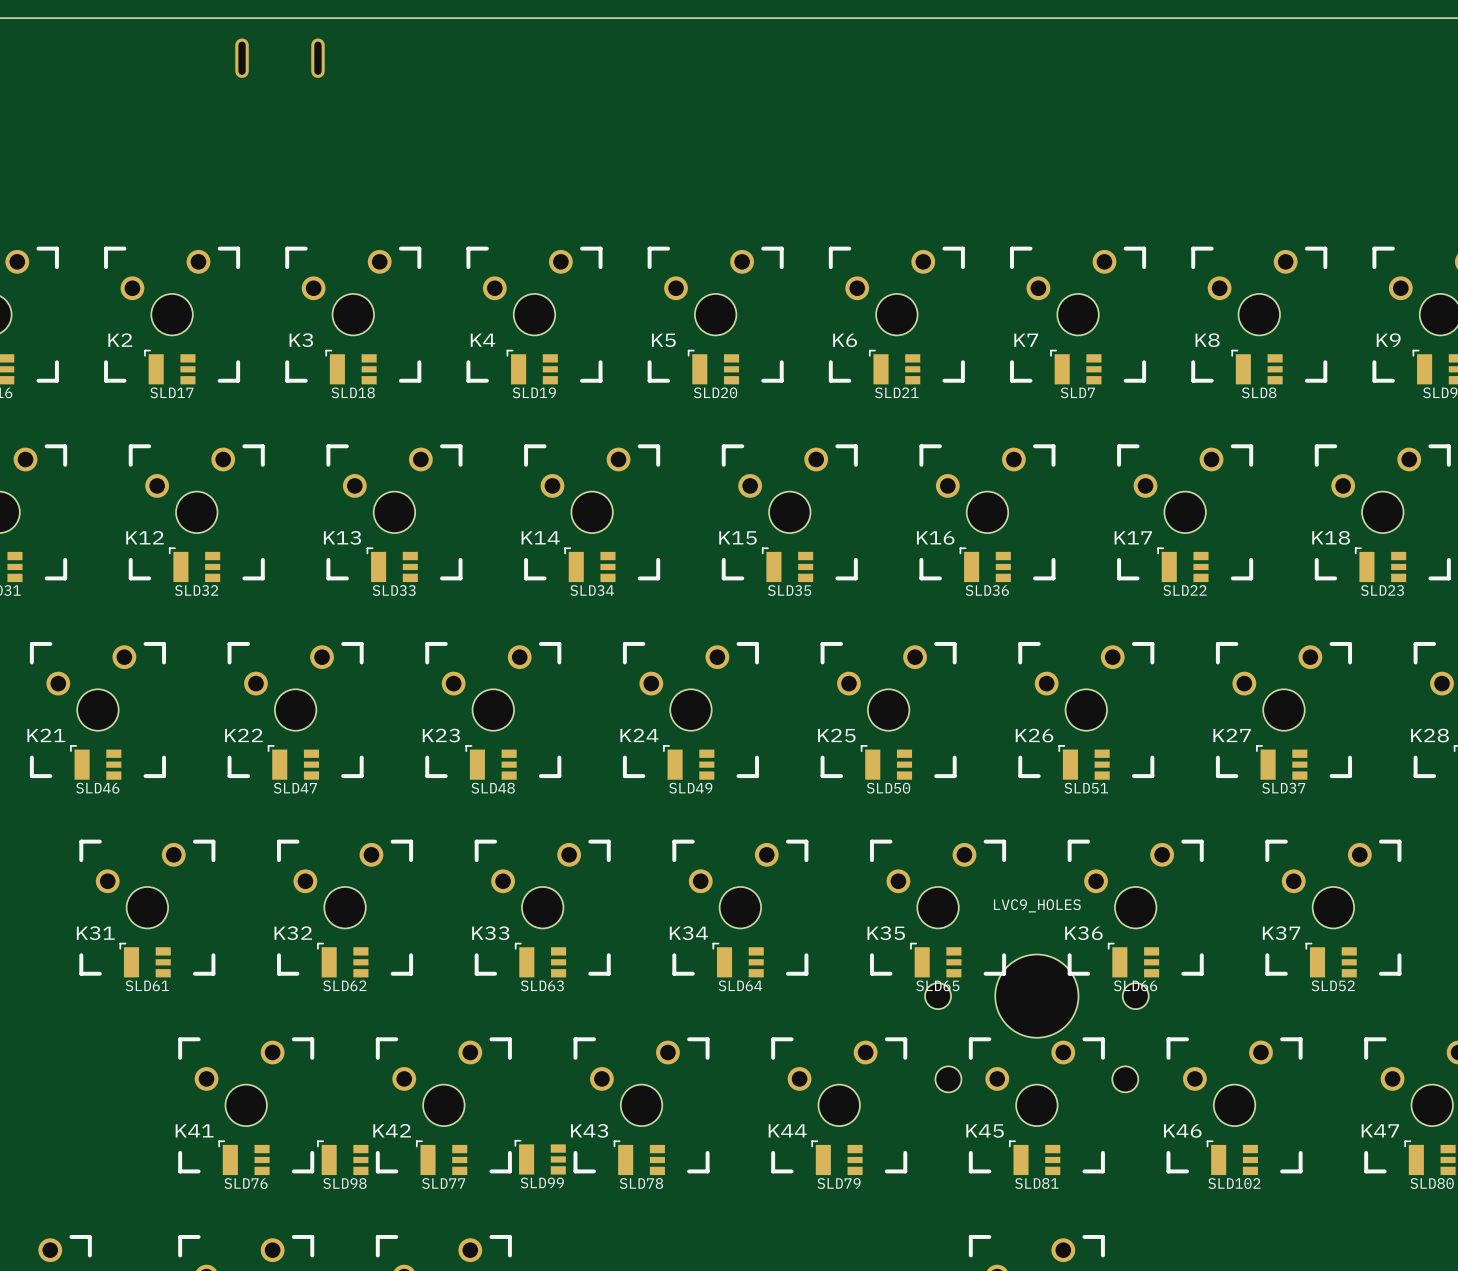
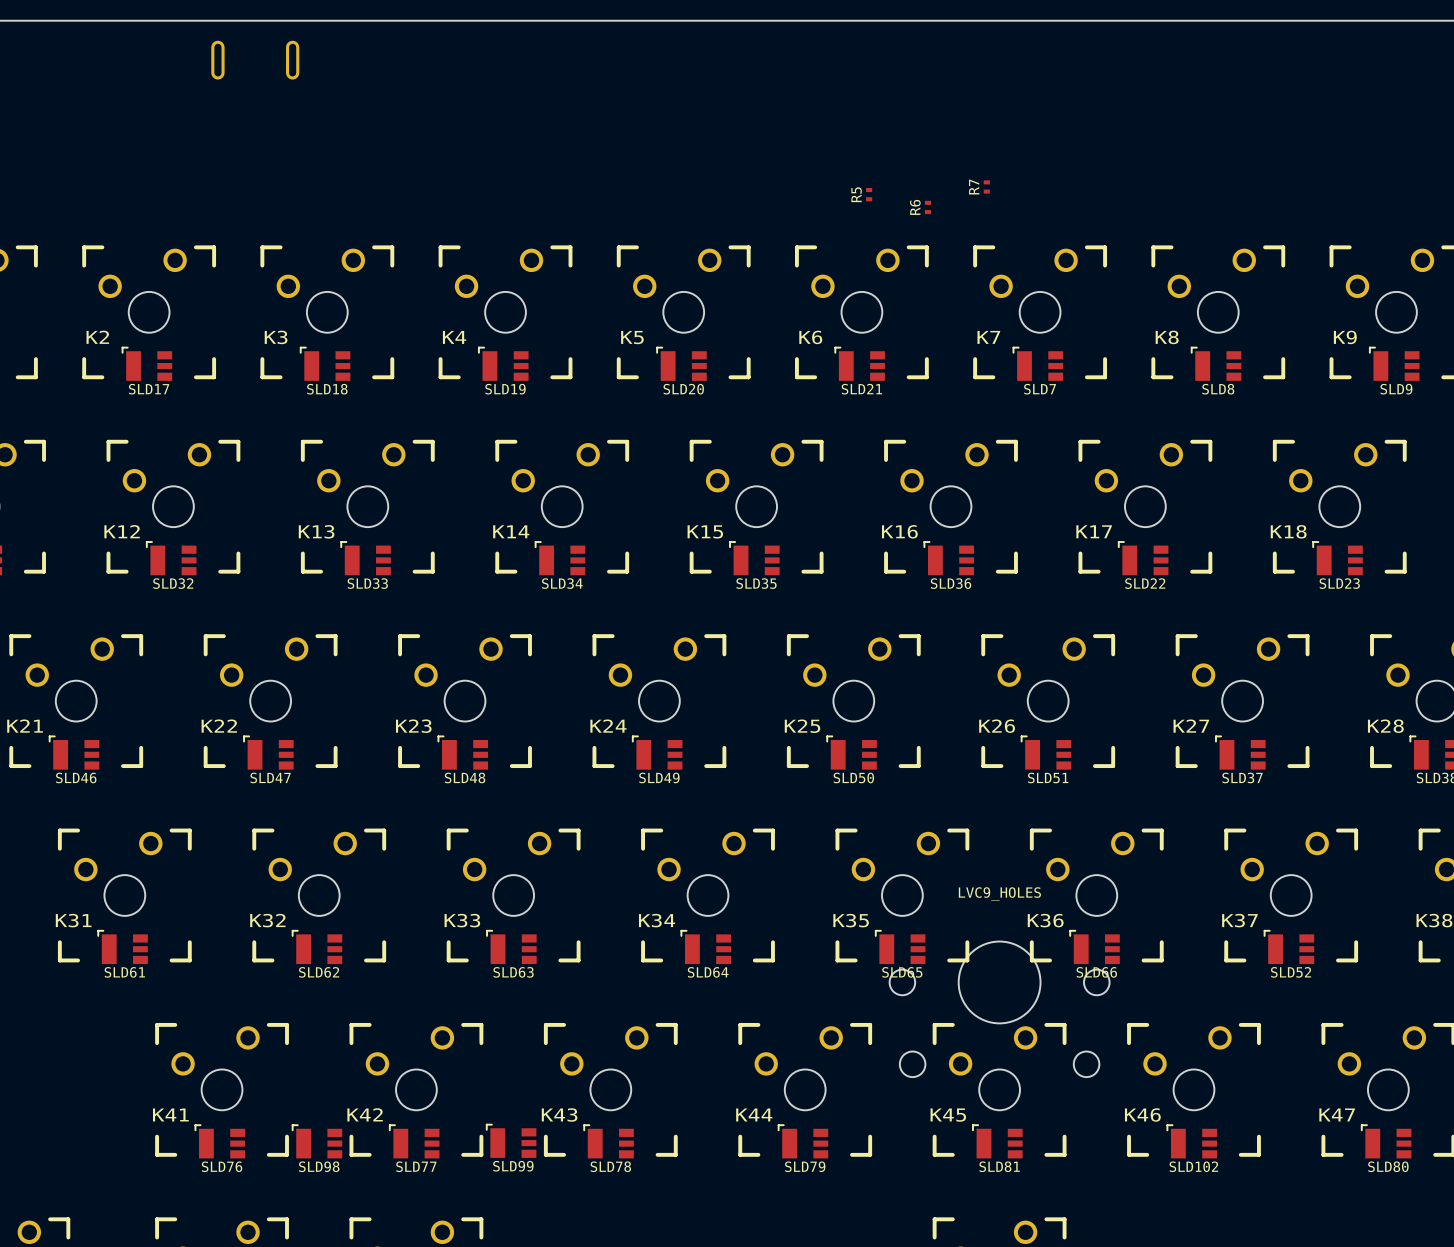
R7: none -> (986, 186)
R5: none -> (869, 194)
R6: none -> (927, 207)

